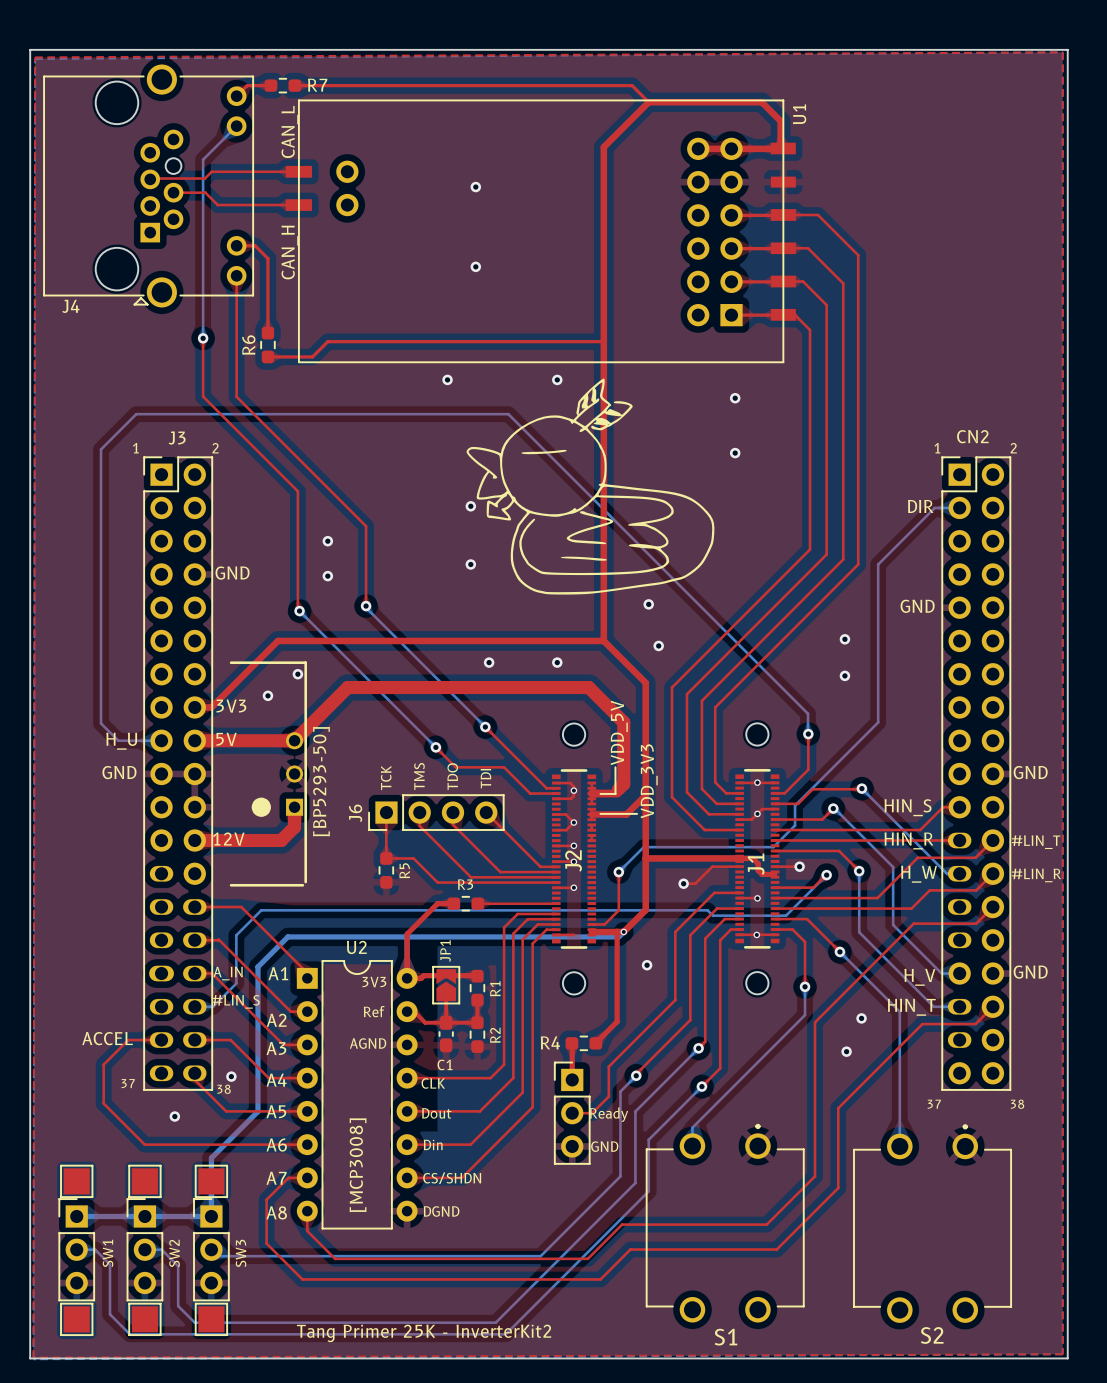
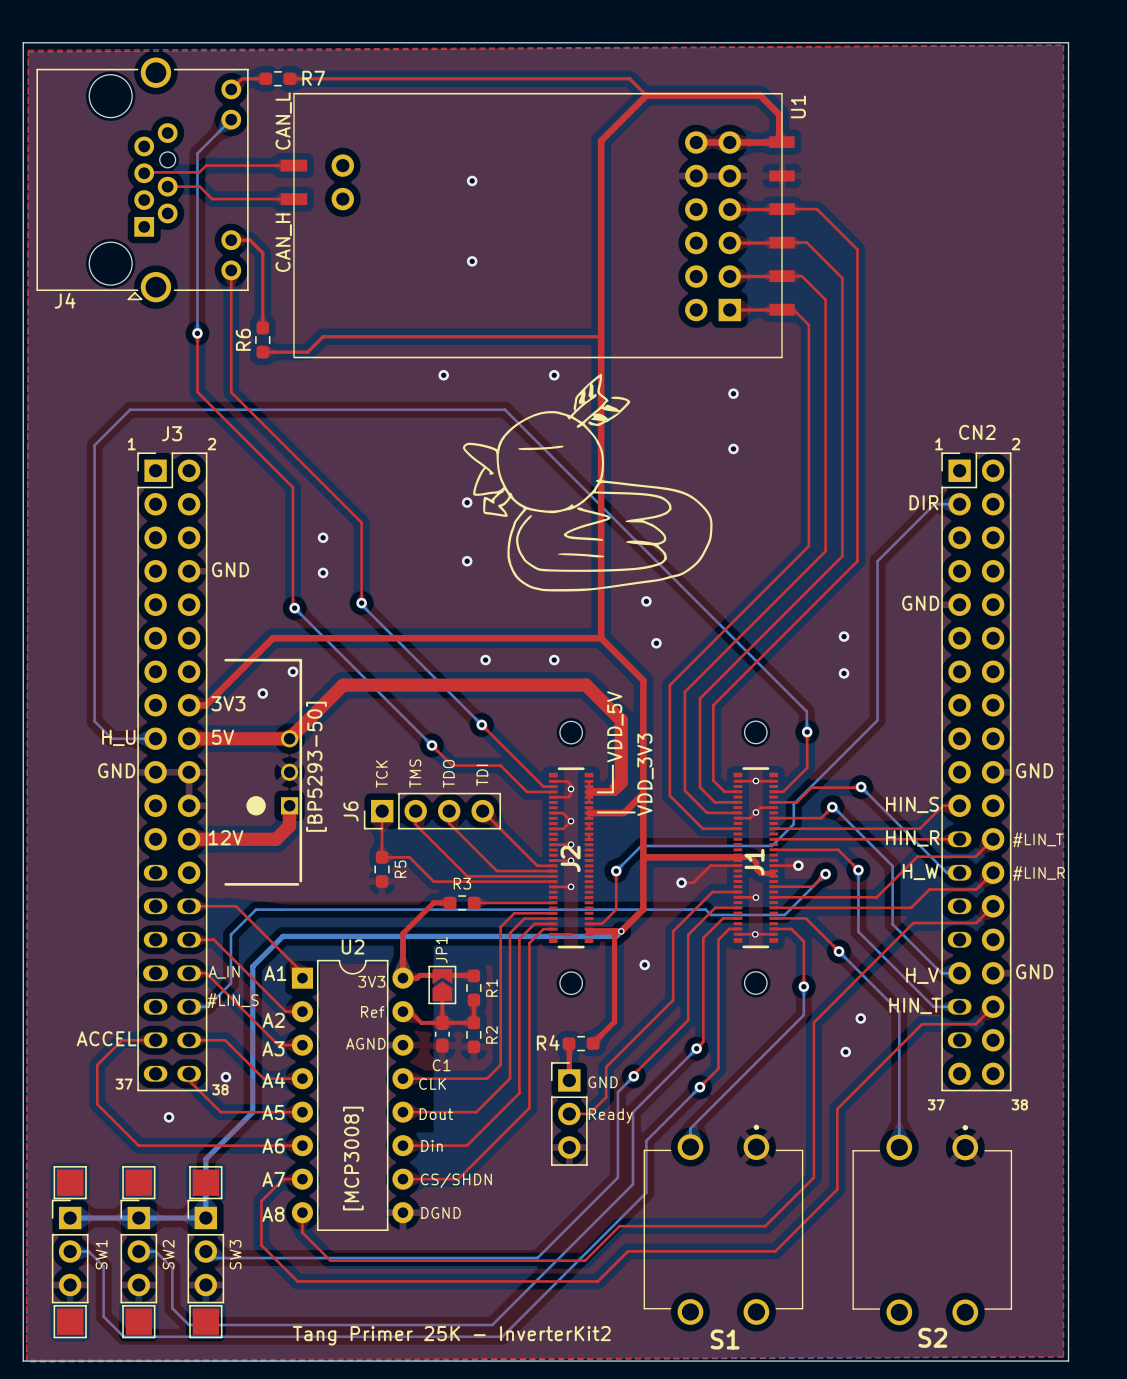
text position: GND (604, 1146) -> GND (603, 1082)

